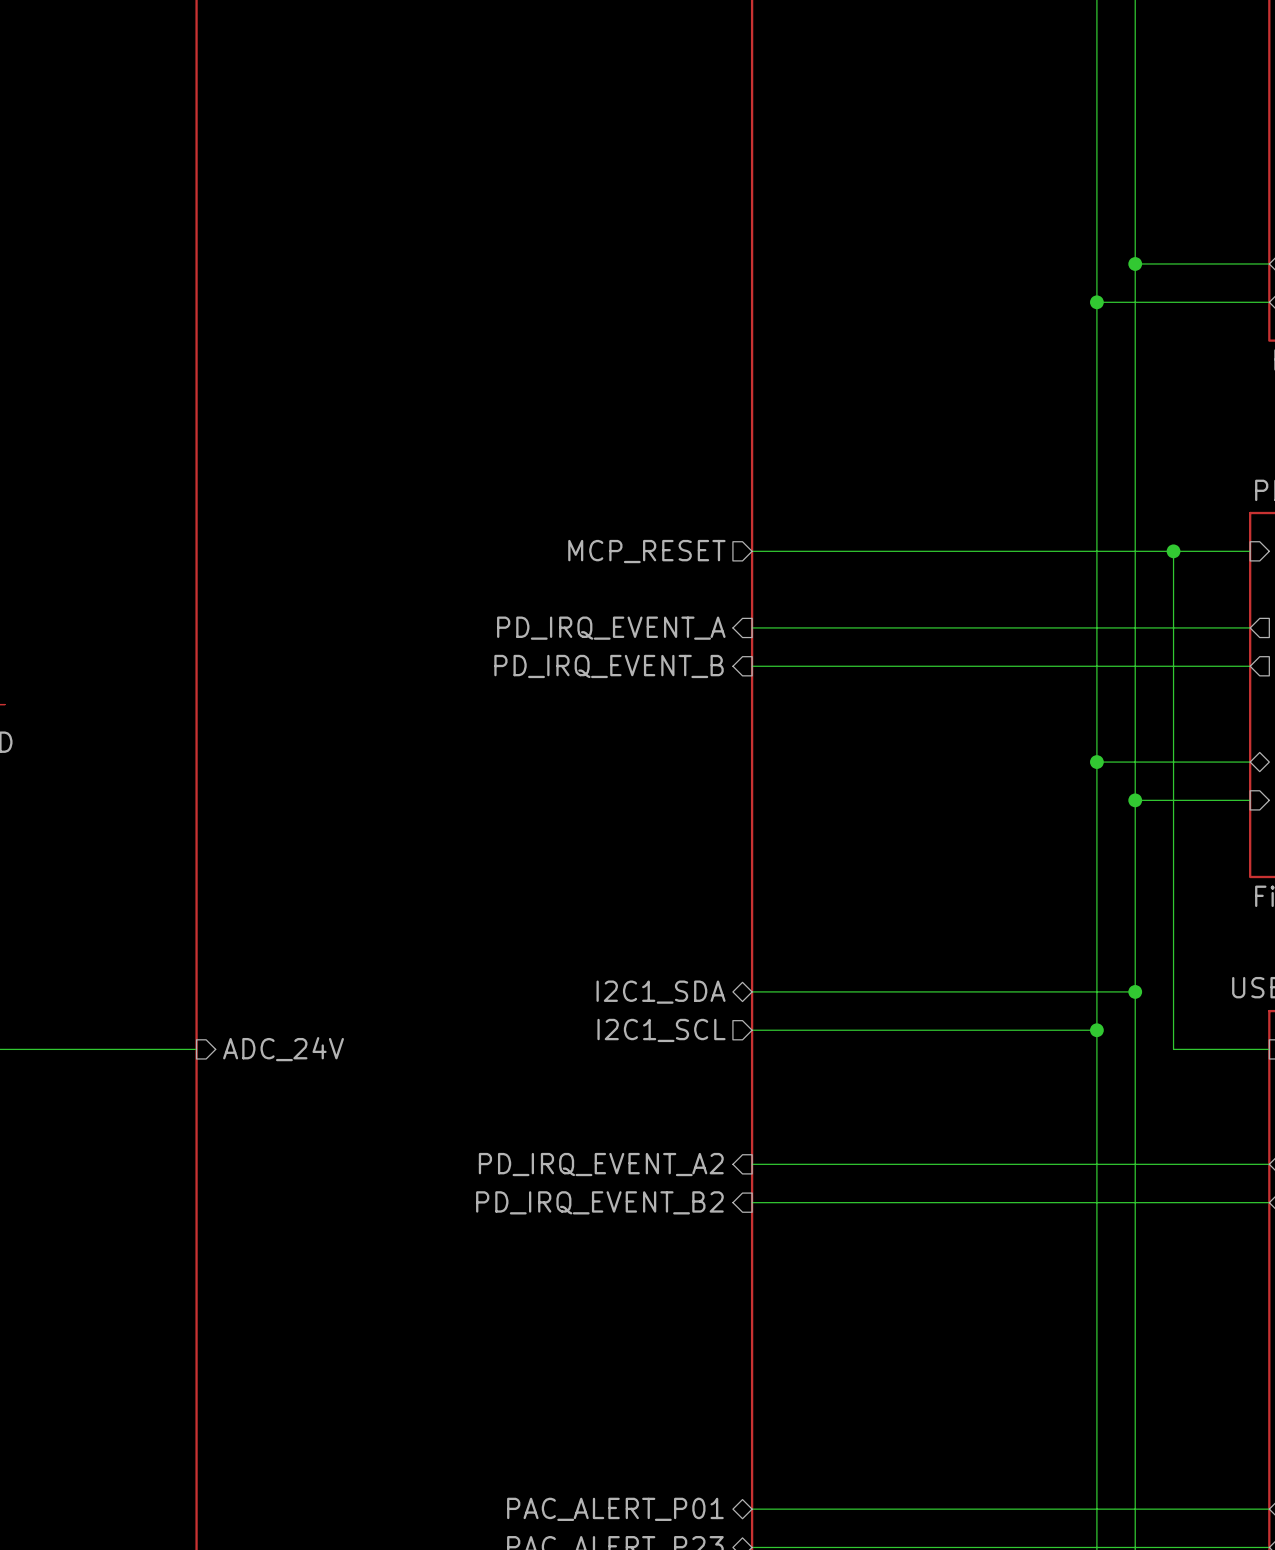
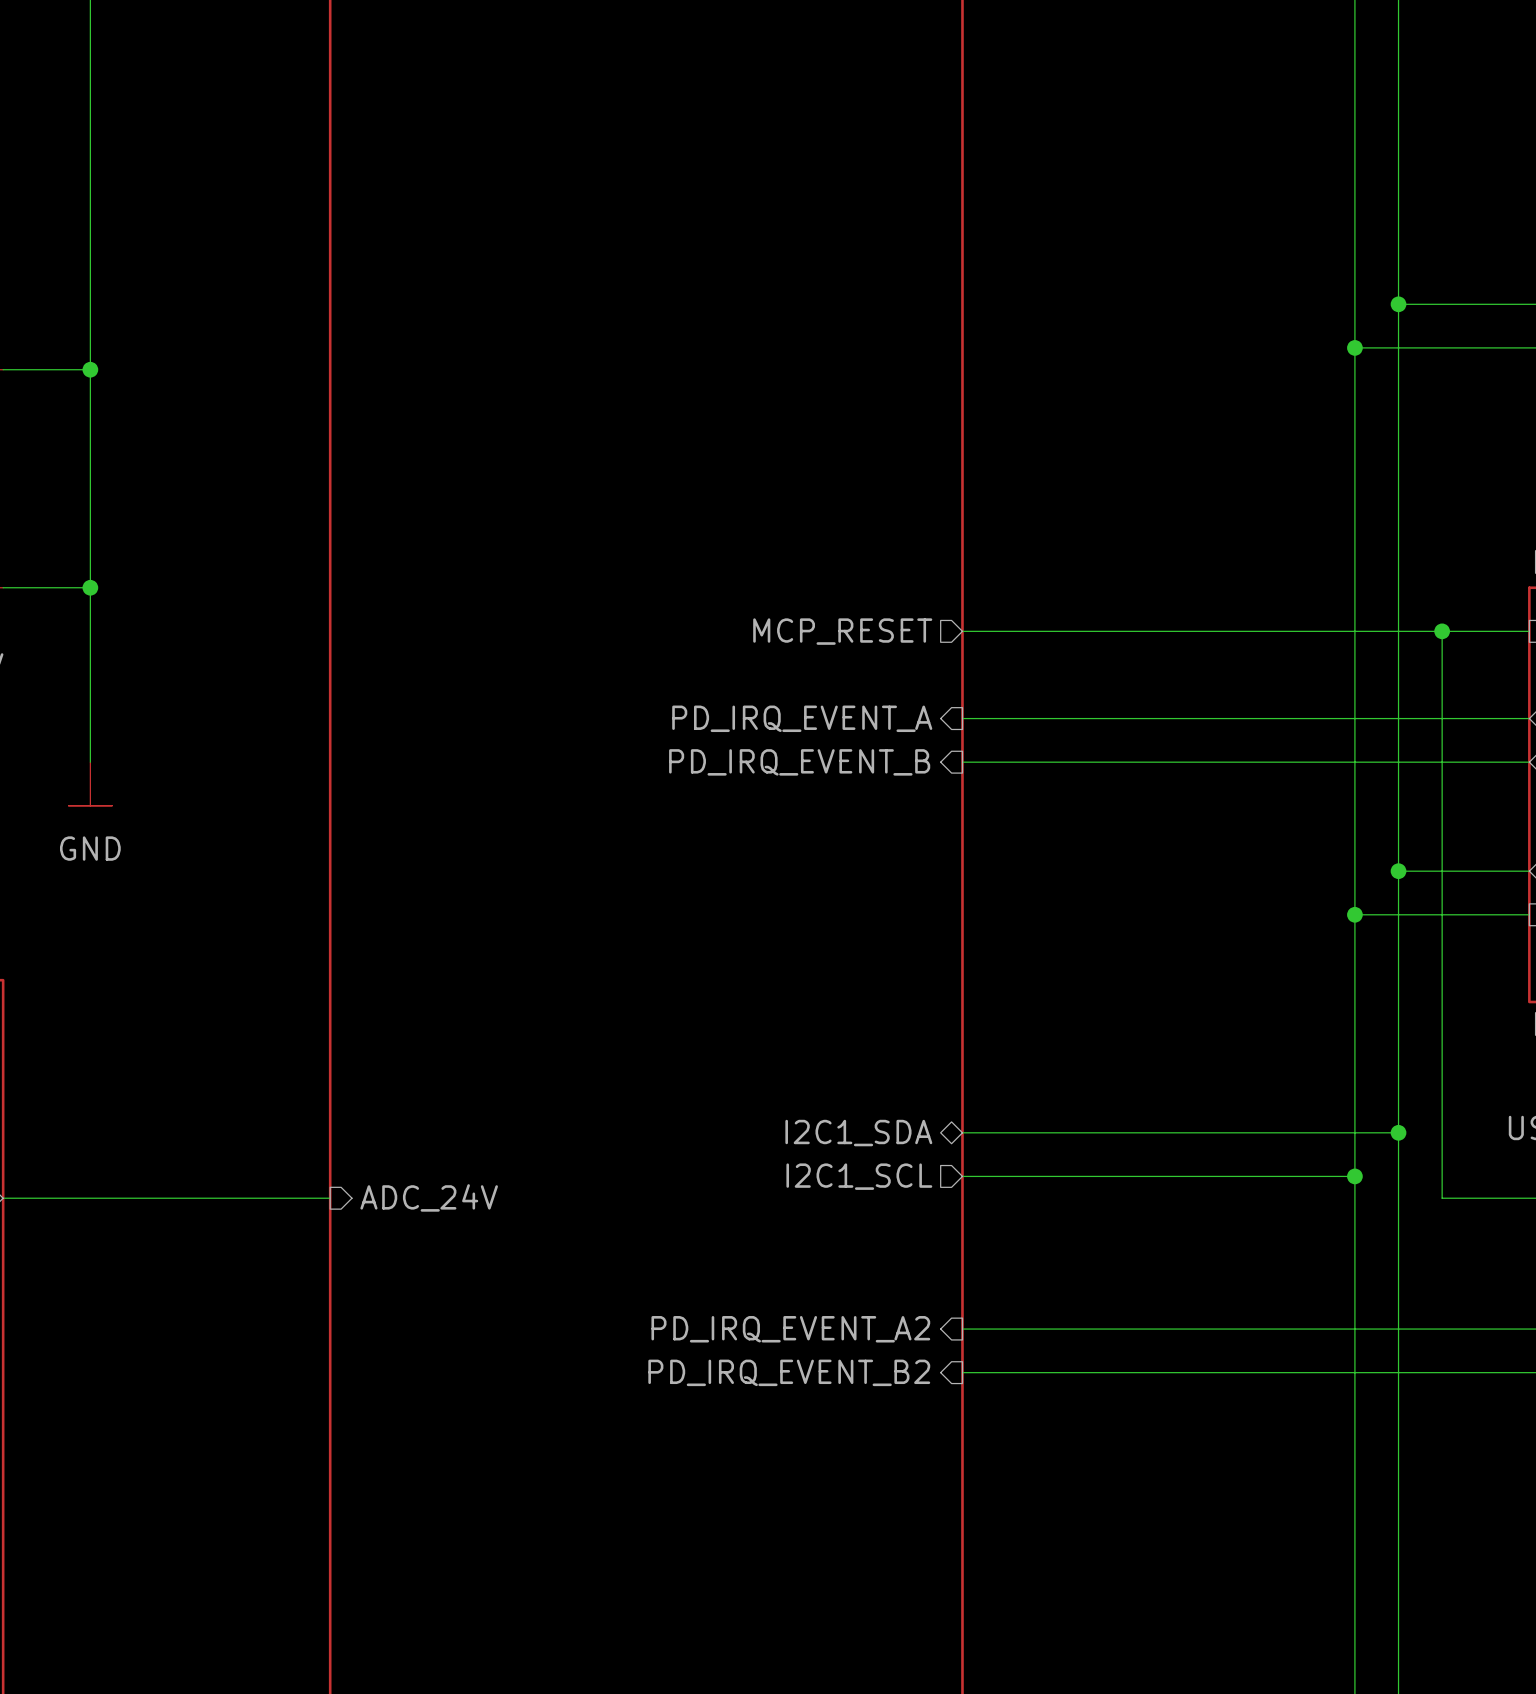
wire: (1096, 762) (1135, 762) -> (1354, 914) (1398, 914)
junction: (1096, 762) -> none
junction: none -> (1398, 871)
junction: none -> (1354, 914)
junction: (1135, 800) -> none

